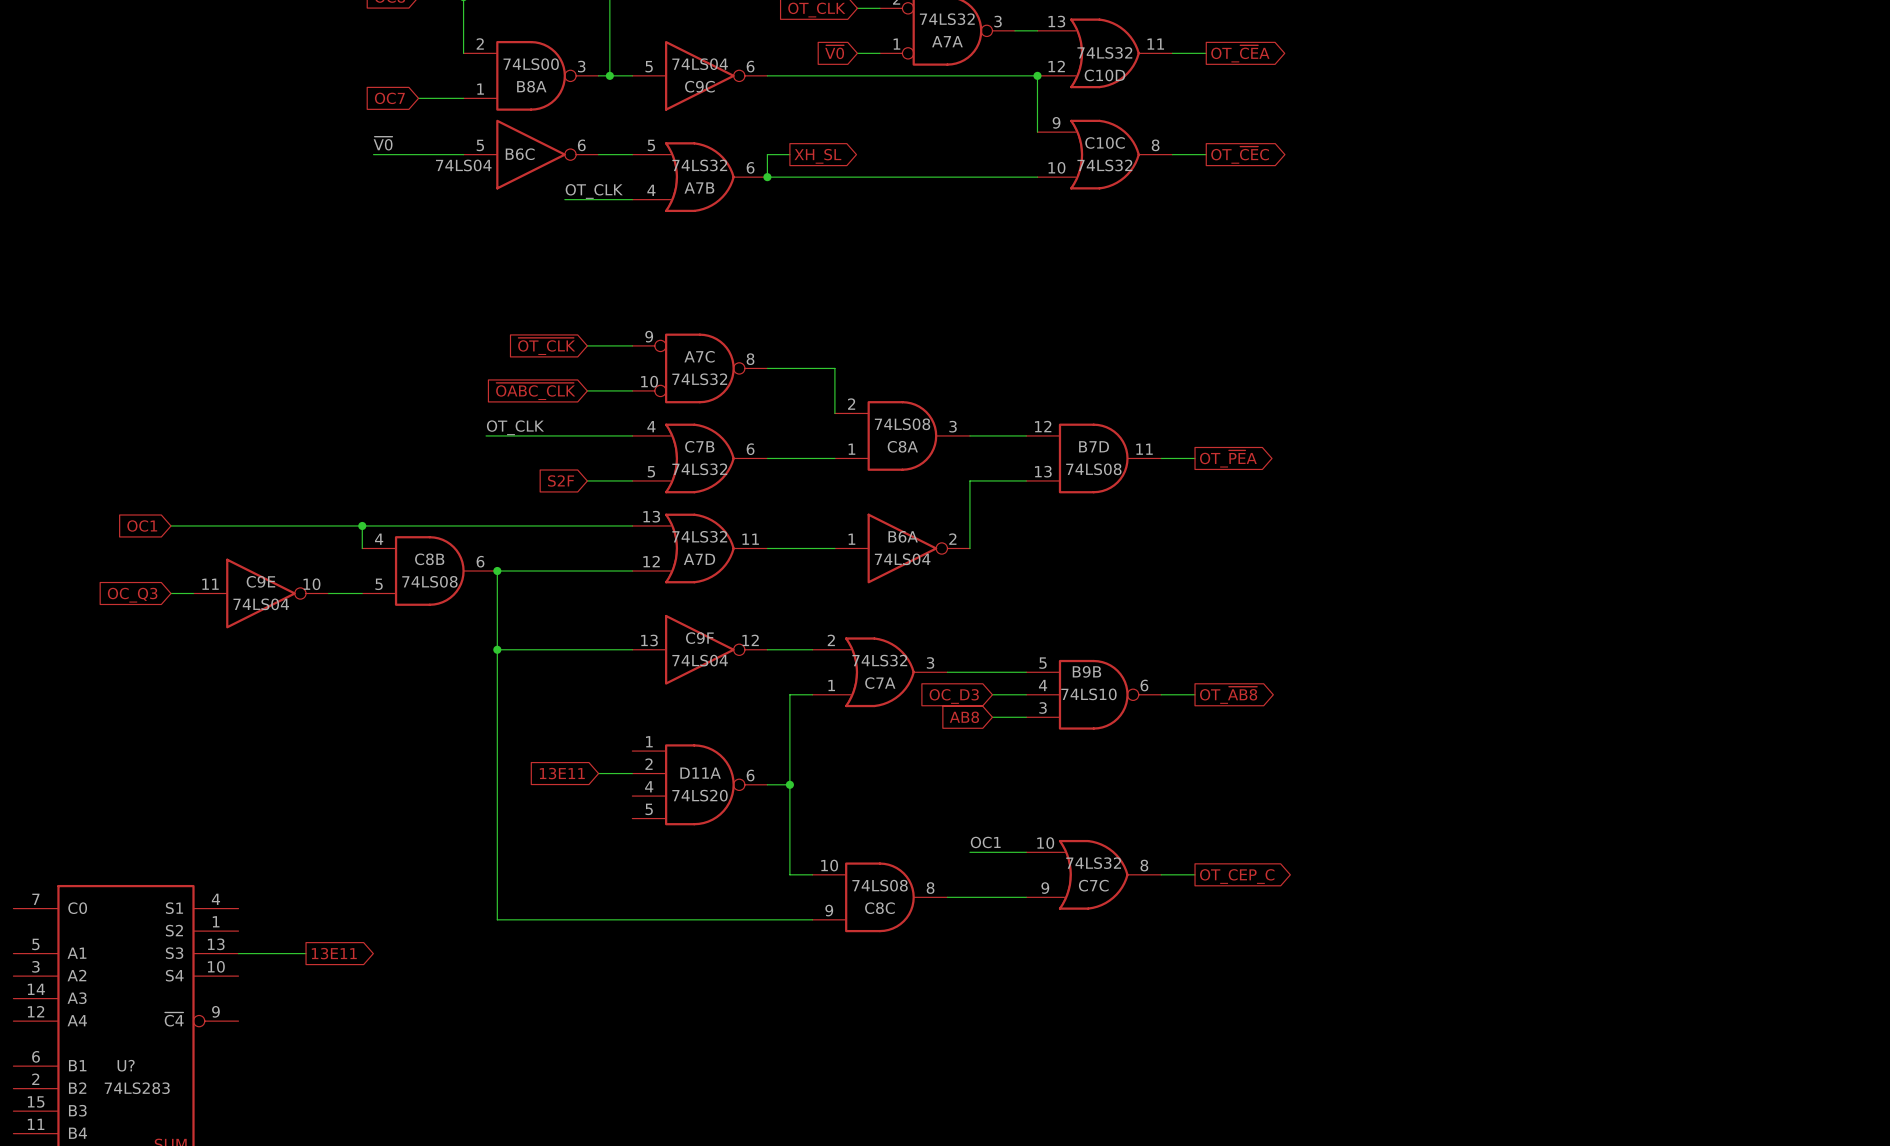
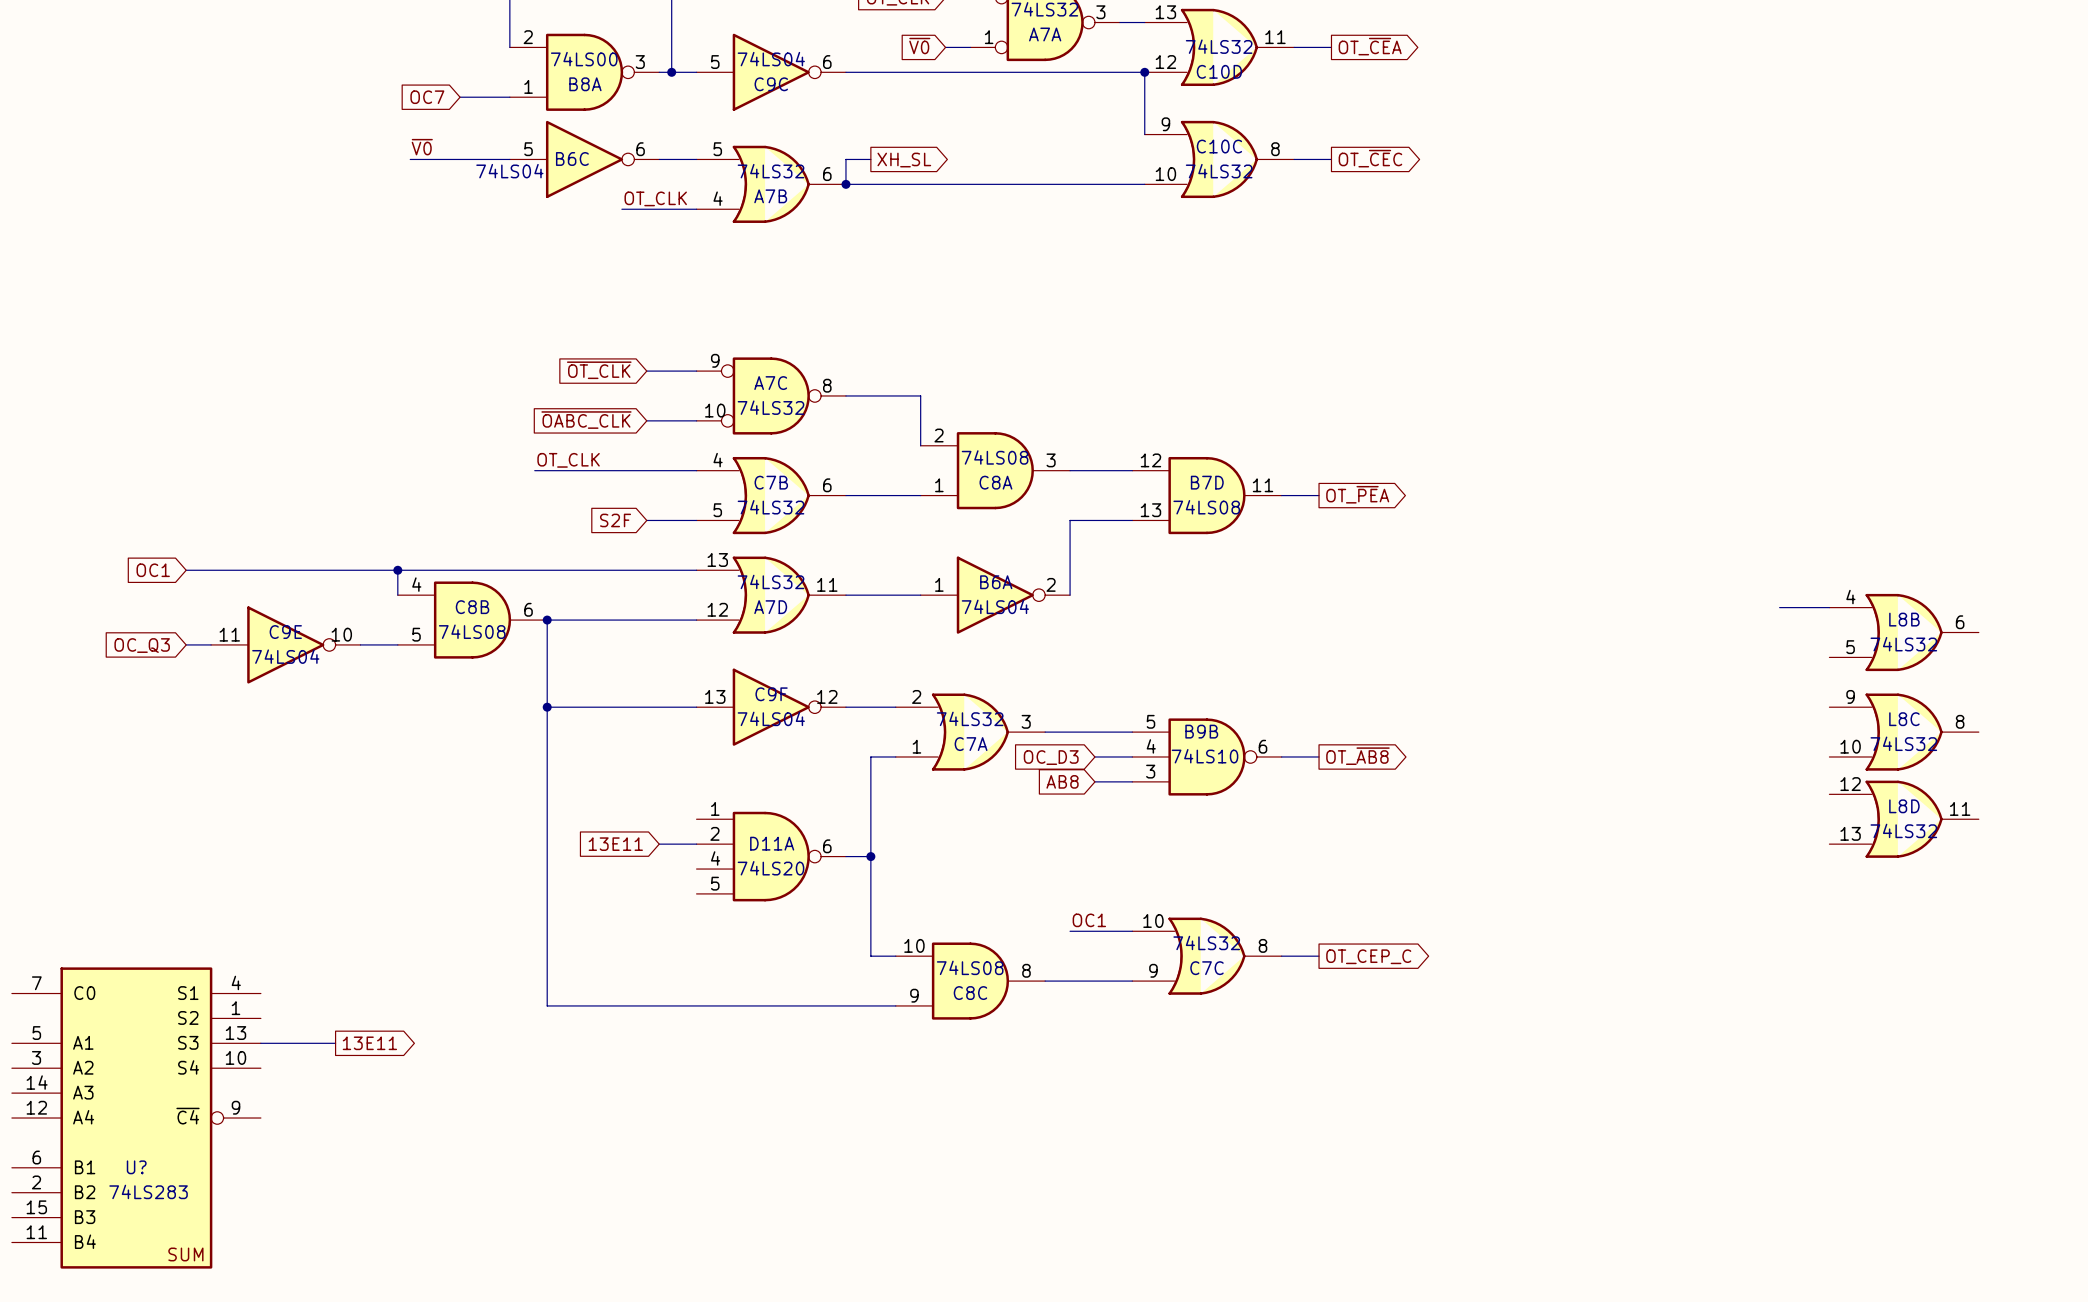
wire: none -> (1779, 607) (1829, 607)
L8B: none -> 74LS32 (1904, 632)
L8C: none -> 74LS32 (1904, 732)
L8D: none -> 74LS32 (1904, 819)

